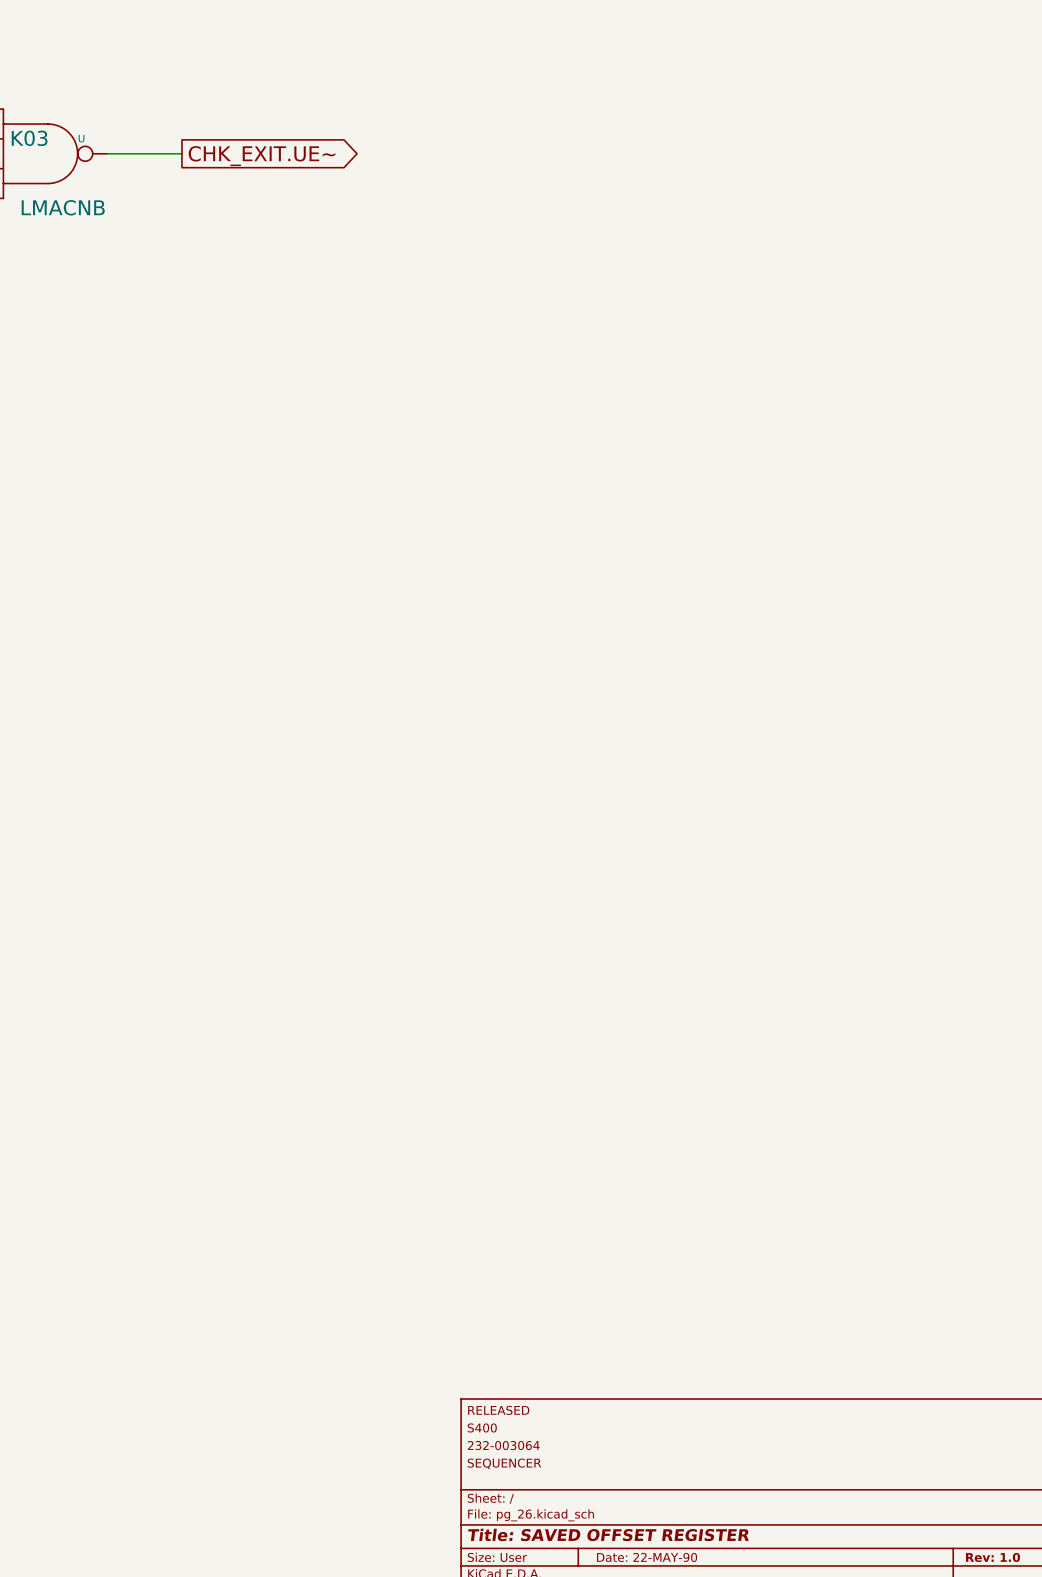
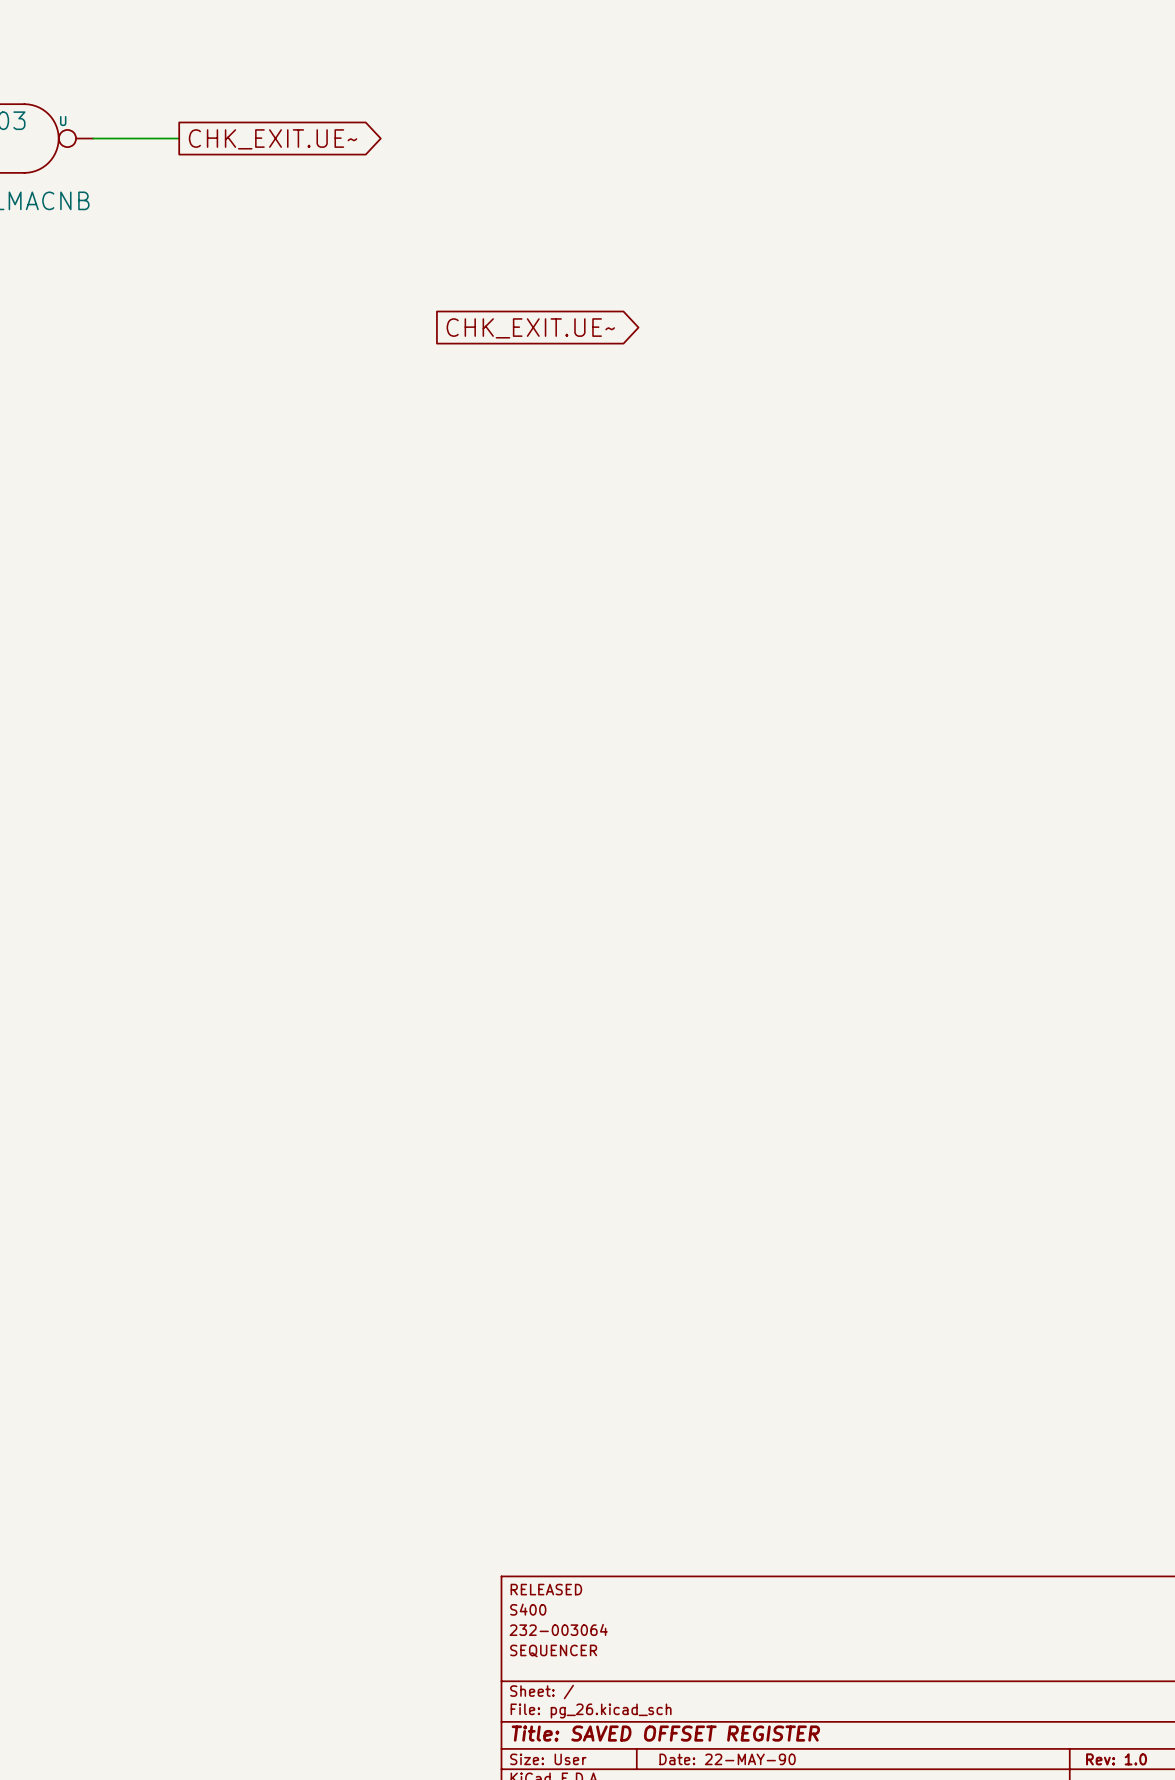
global label: none -> CHK_EXIT.UE~ (530, 328)

